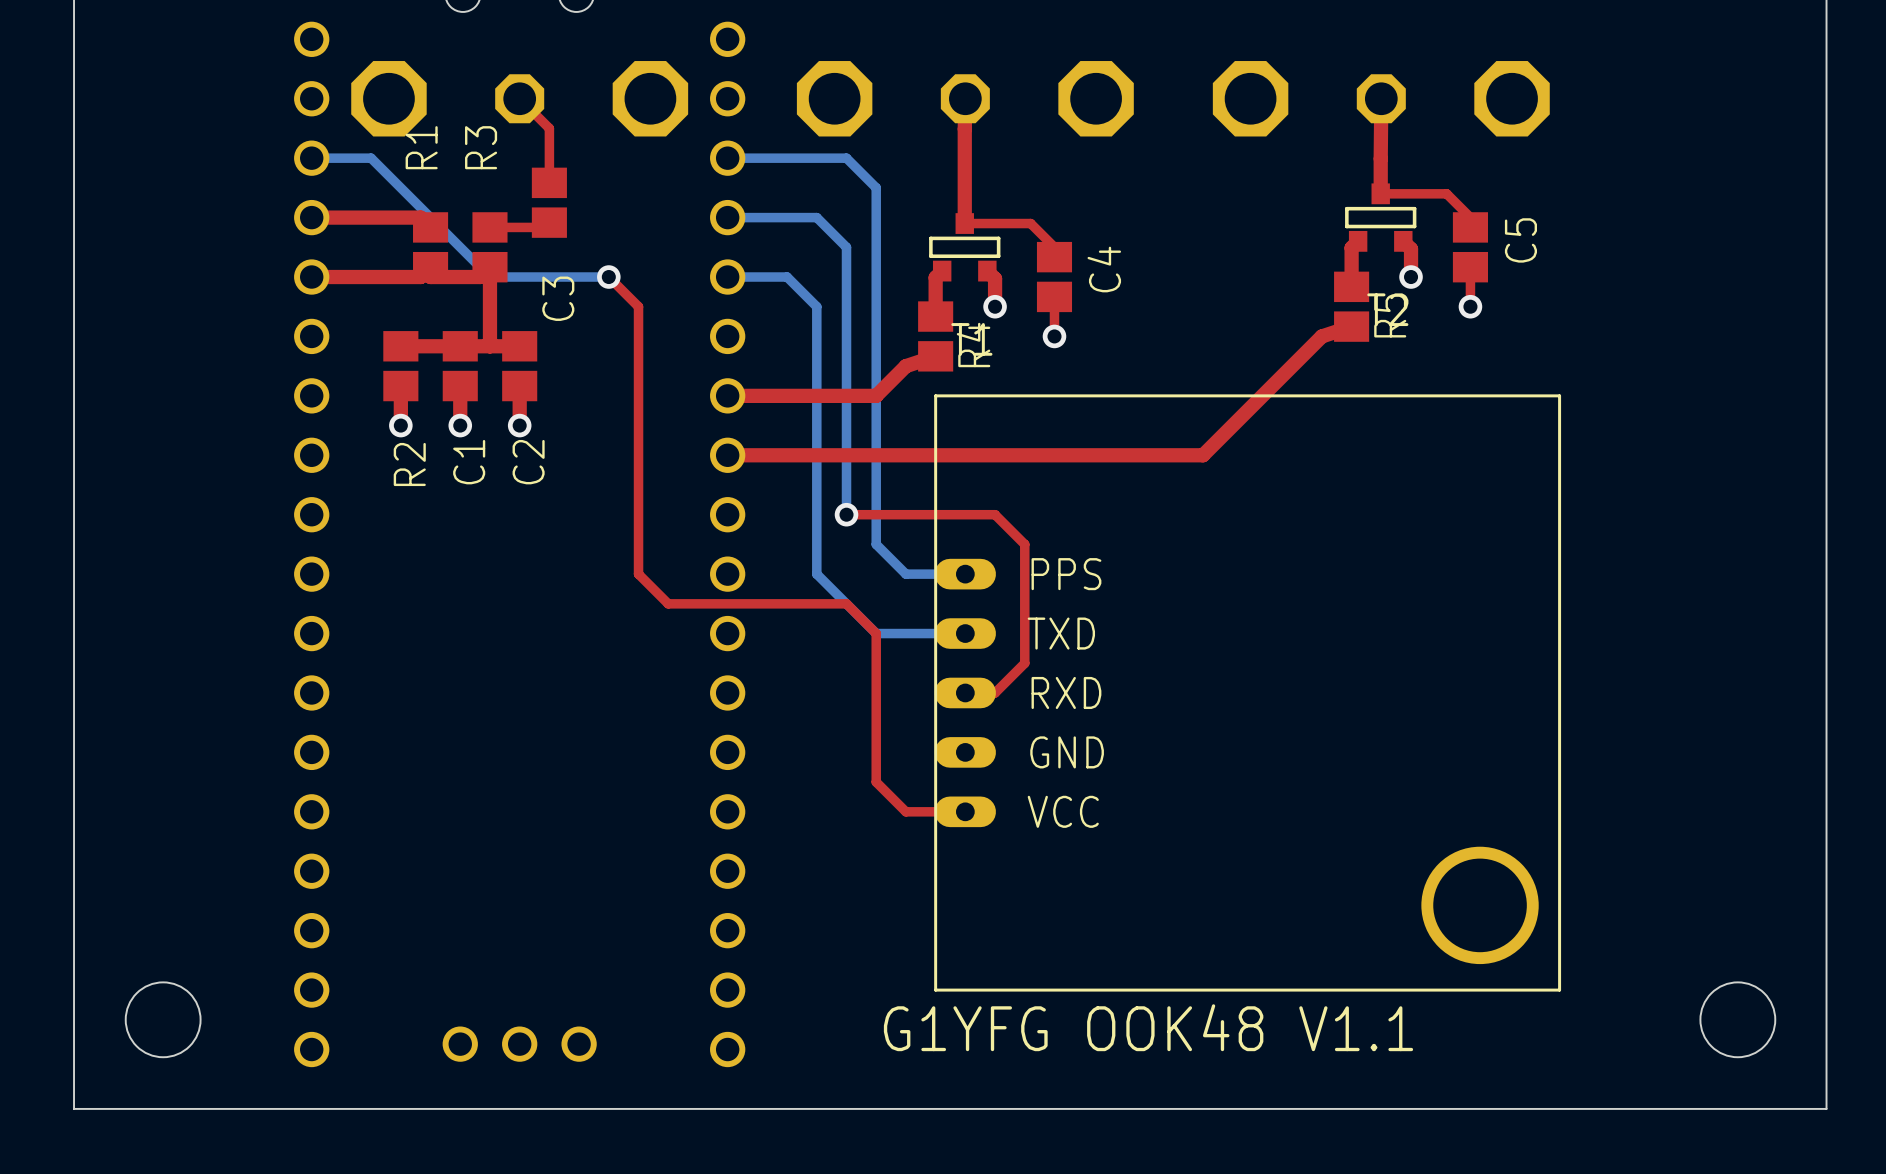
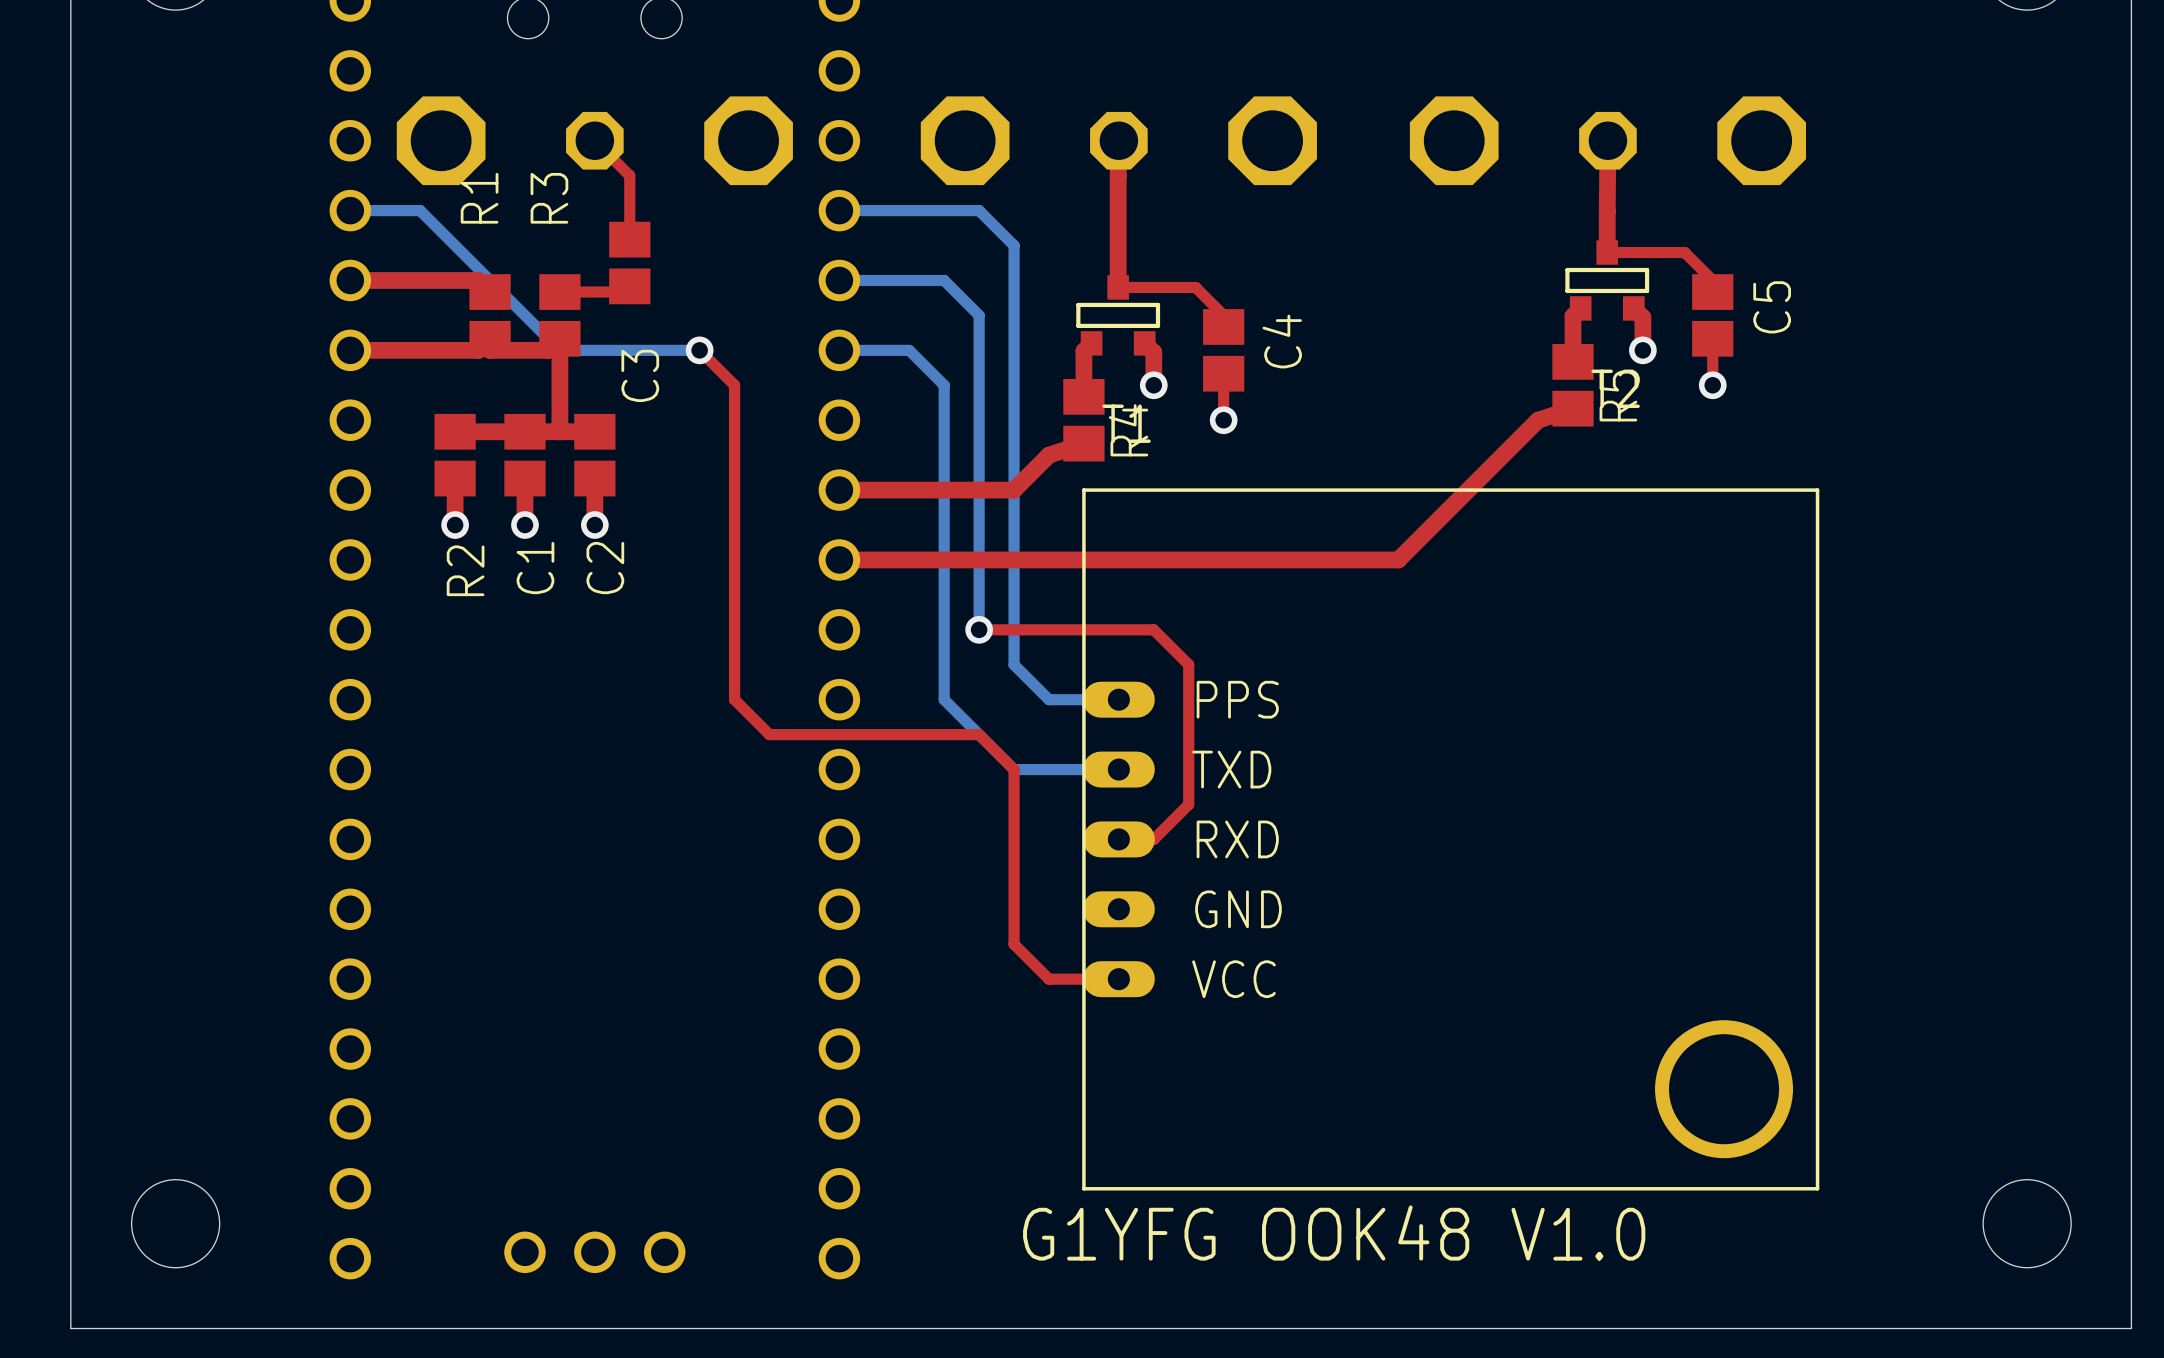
text: G1YFG OOK48 V1.1 (1148, 1027) -> G1YFG OOK48 V1.0 (1334, 1233)

